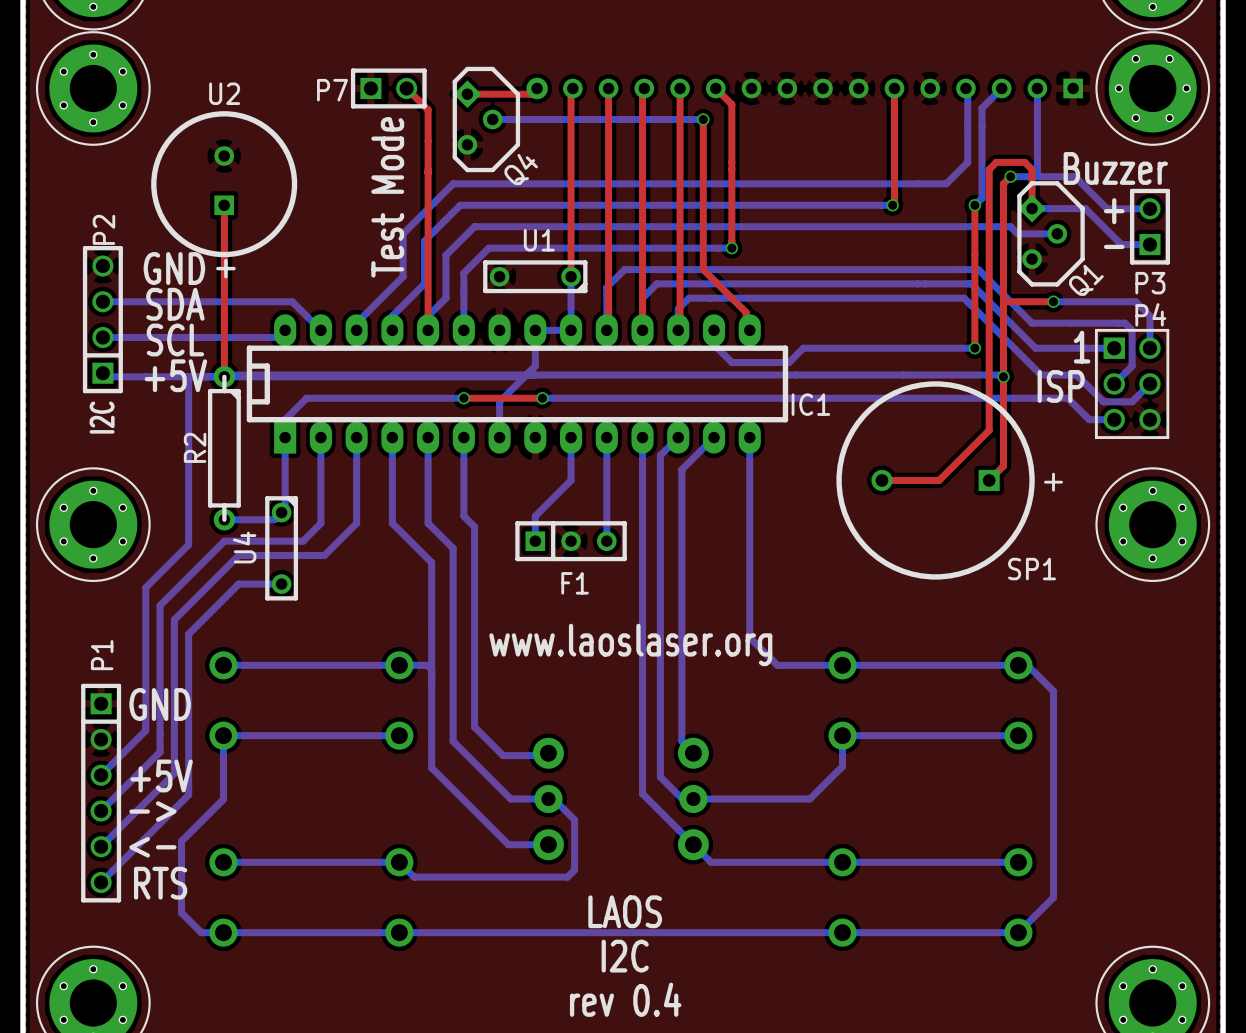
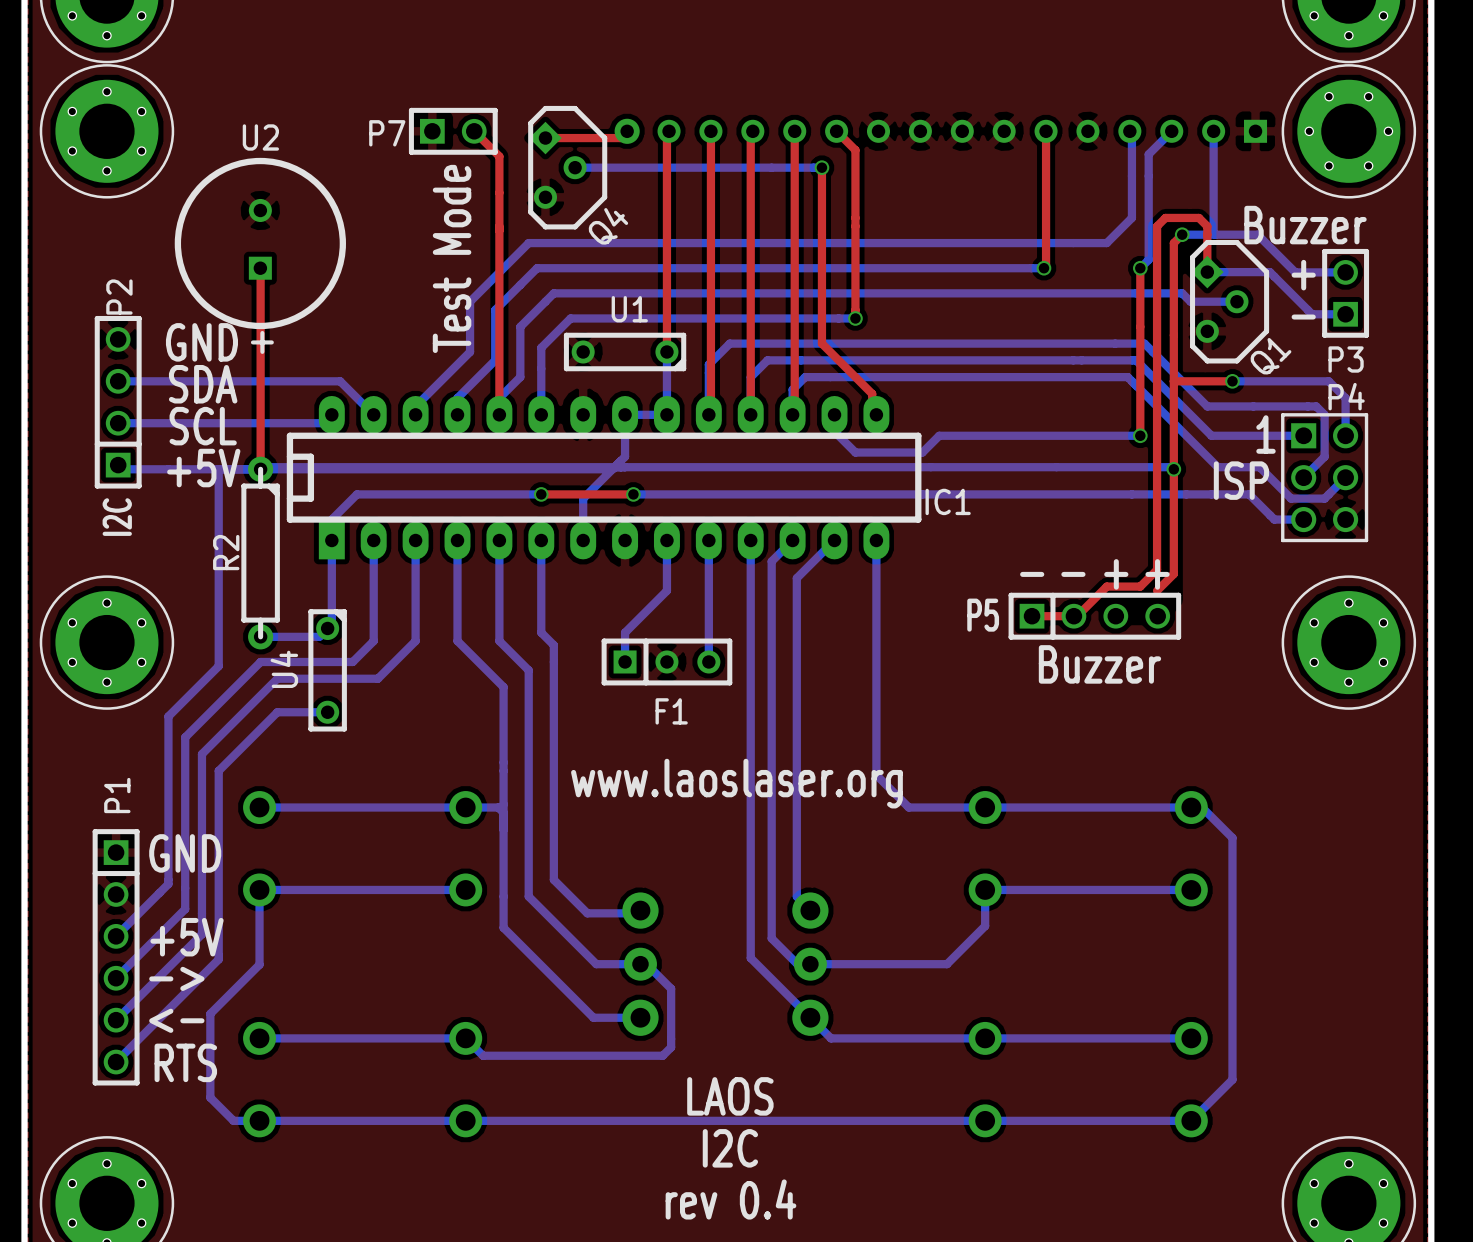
top track: (989, 430) (939, 480) (881, 480) -> (1157, 532) (1157, 569) (1140, 586) (1106, 586) (1077, 616) (1032, 616)
text: none -> - (1032, 574)
text: none -> - (1073, 574)
text: none -> + (1116, 574)
text: none -> + (1157, 574)
SP1: (935, 480) -> none
P5: none -> (1094, 616)
text: none -> Buzzer (1099, 664)

